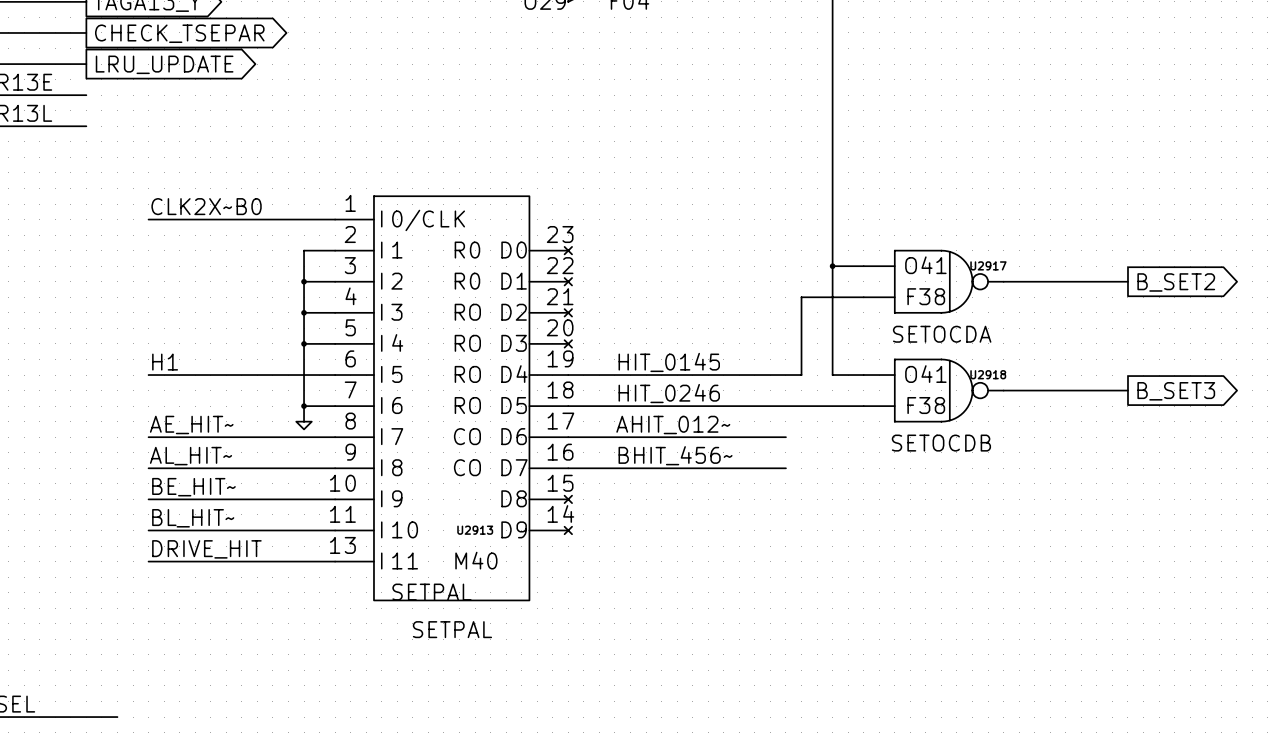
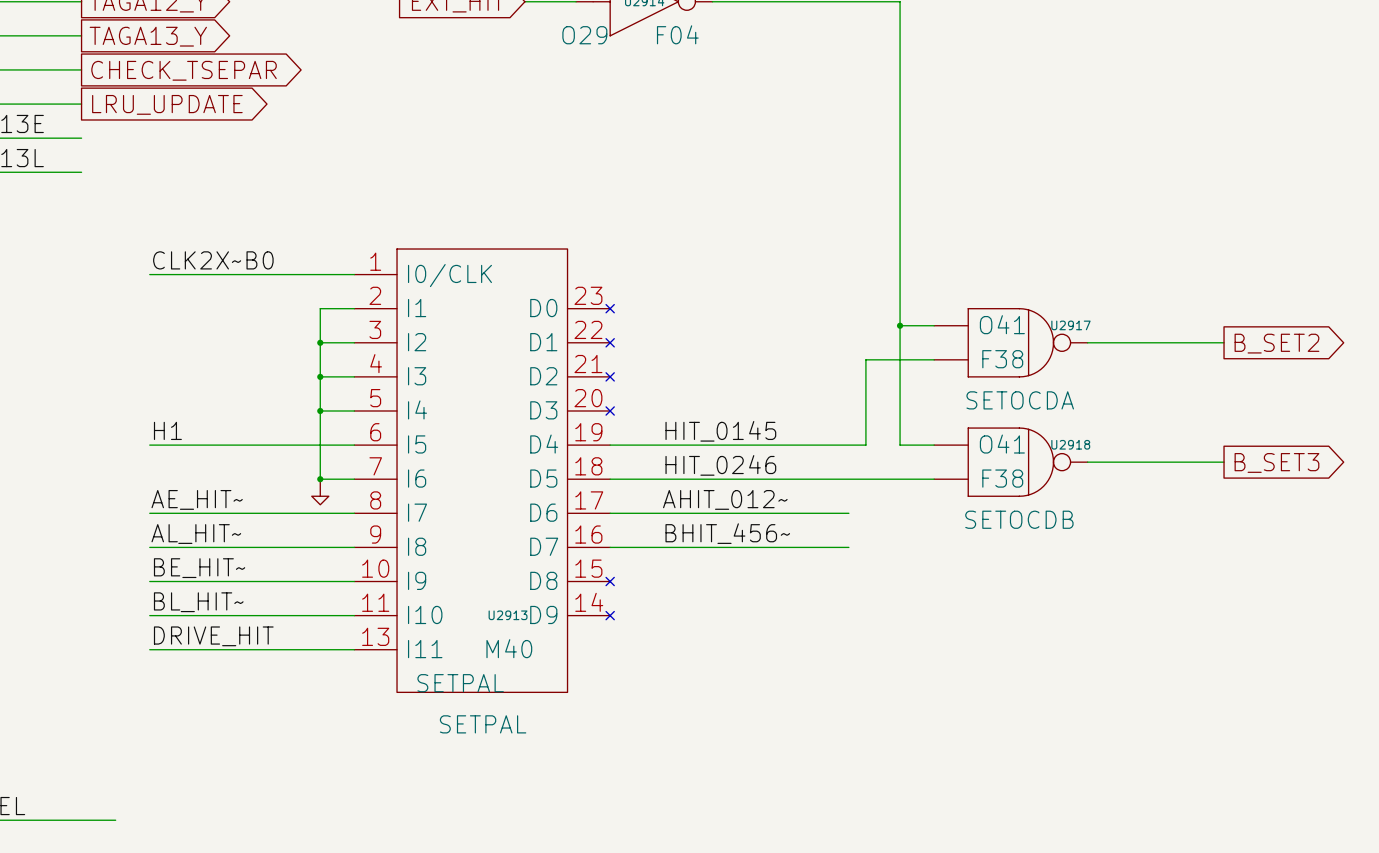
U2913 symbol: [335, 196, 569, 601] -> [354, 249, 611, 693]

